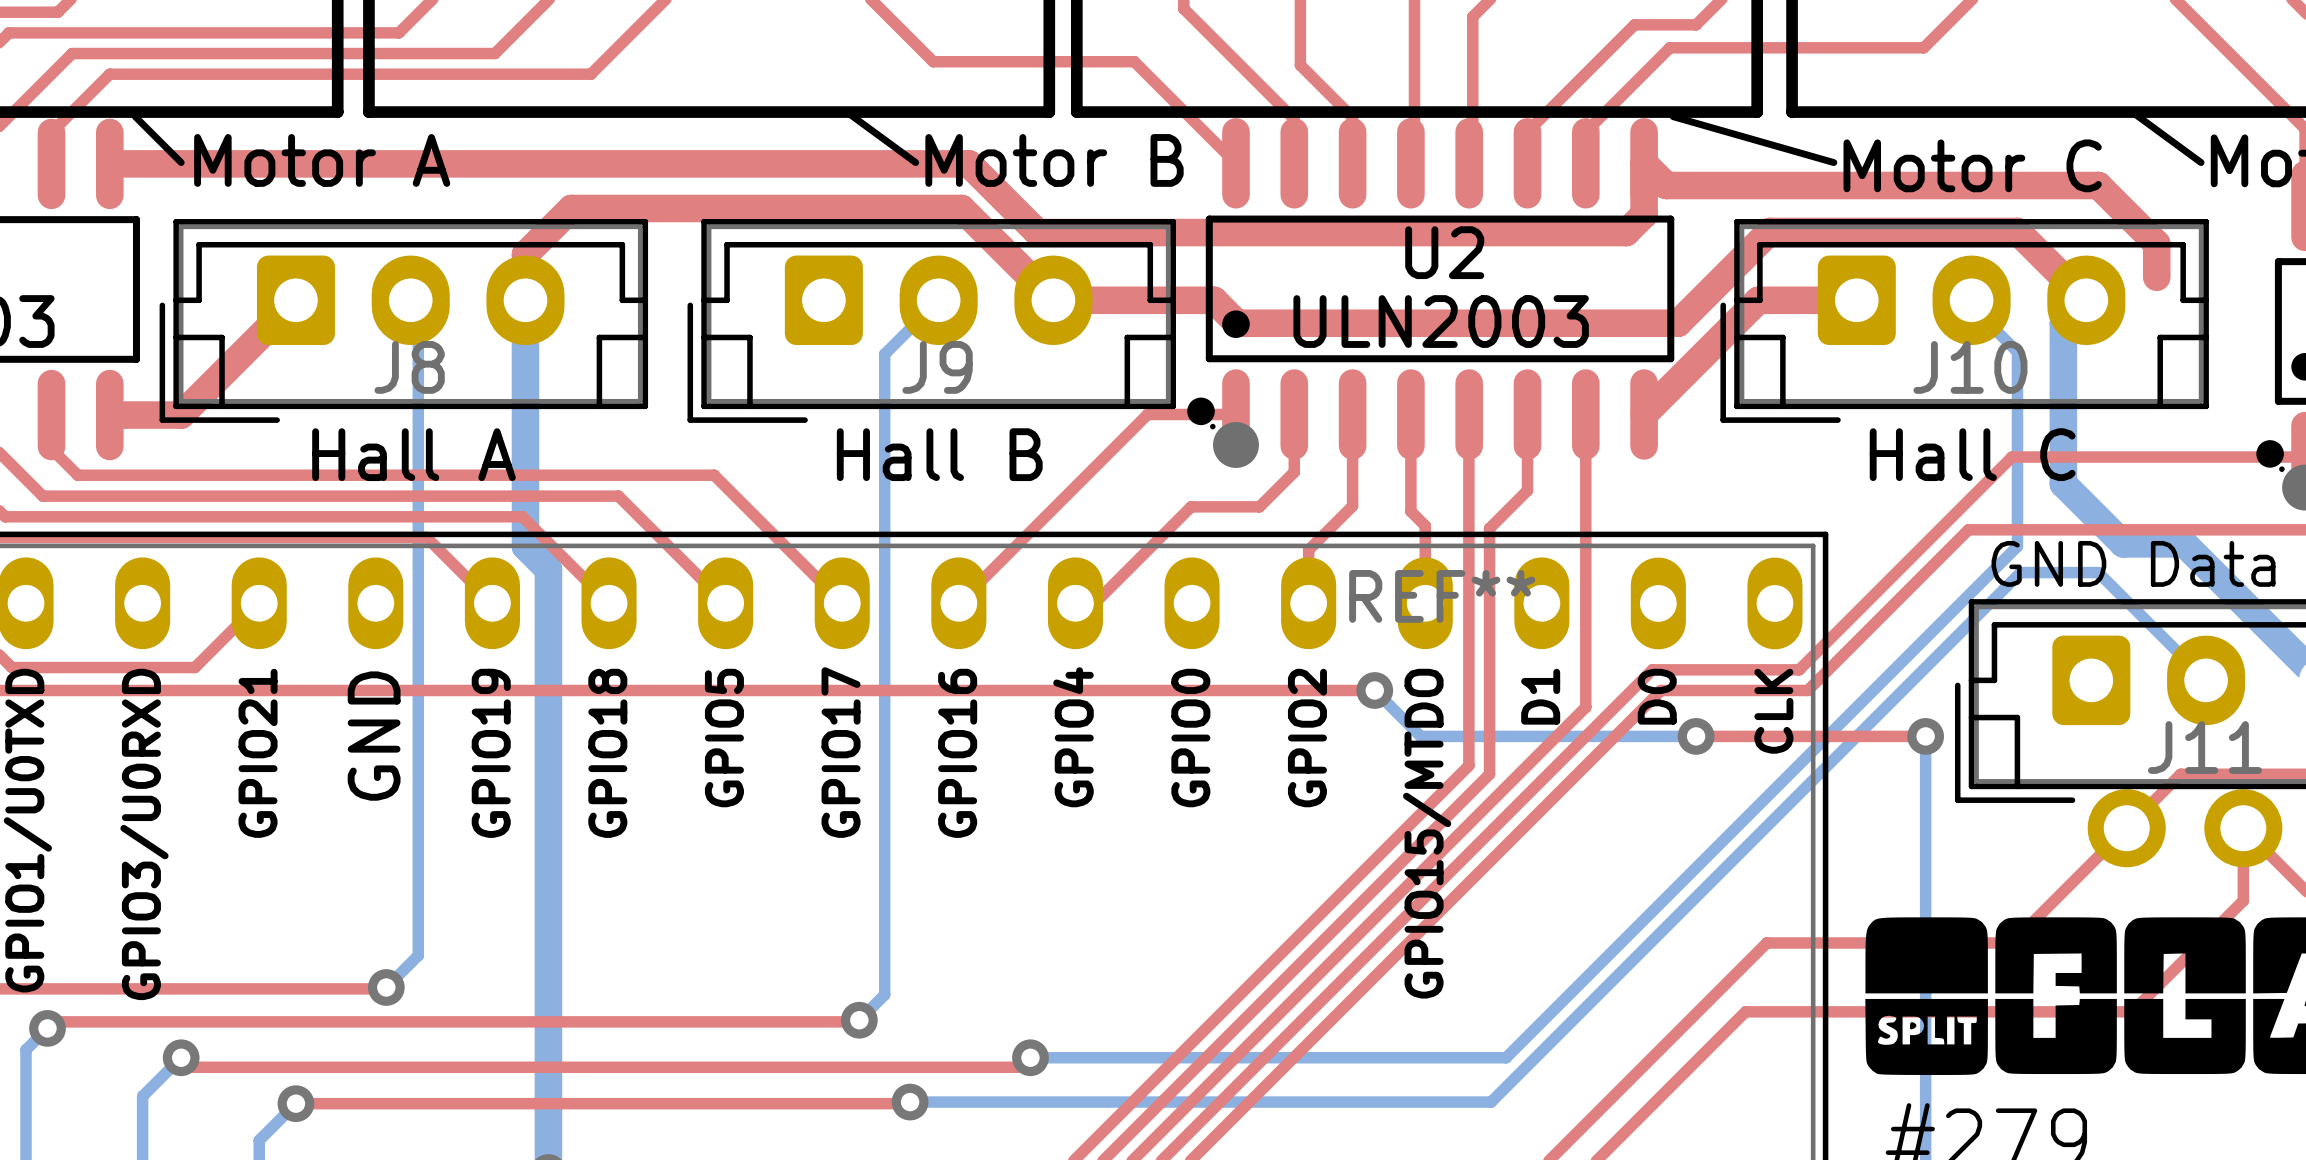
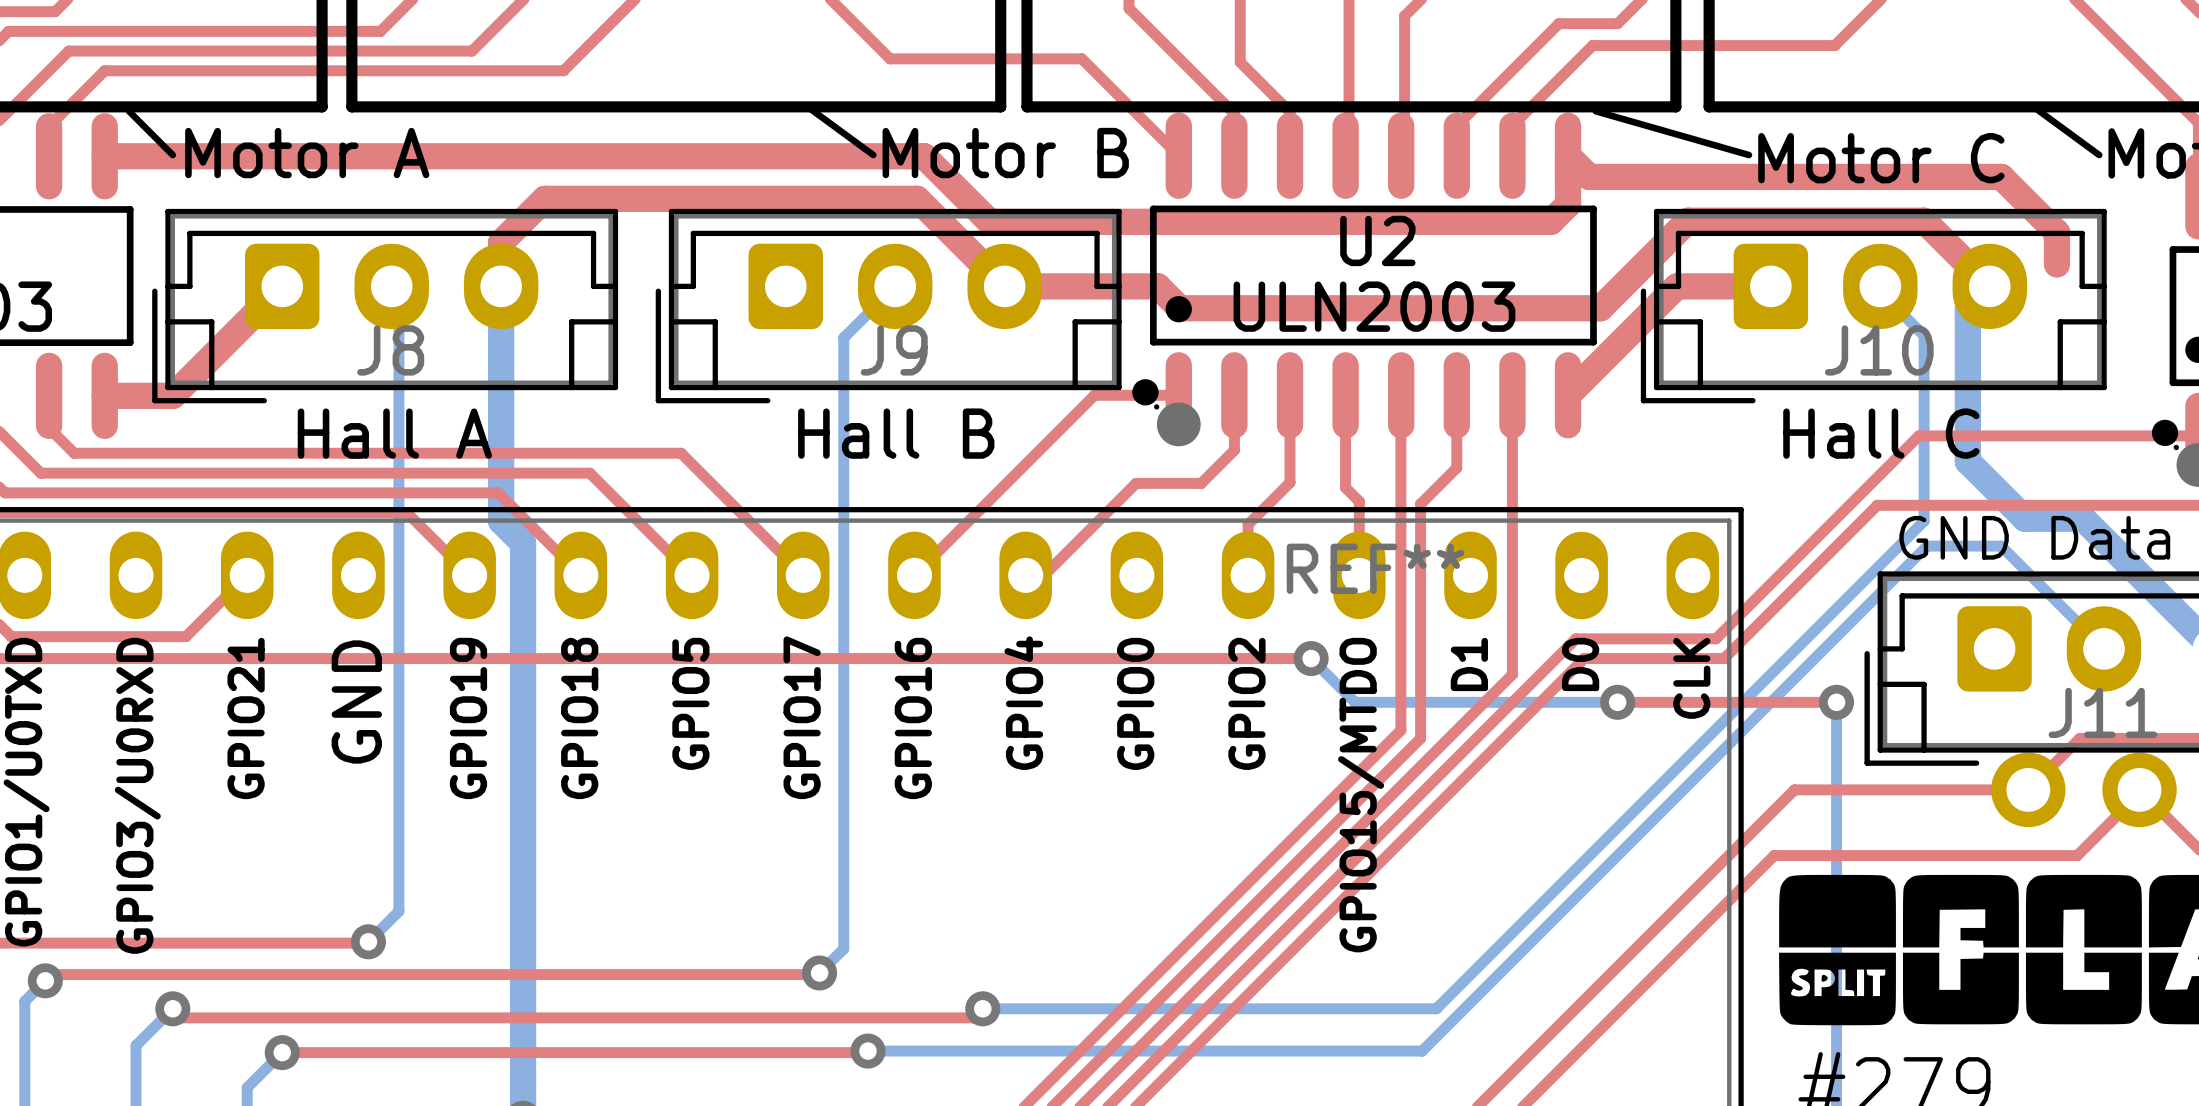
top track: (2126, 828) (2011, 942) (1766, 942) -> (2028, 789) (1794, 789) (1685, 899)
top track: (2243, 831) (2243, 900) (2132, 1011) (1745, 1011) -> (2139, 793) (2077, 855) (1774, 855) (1664, 965)

